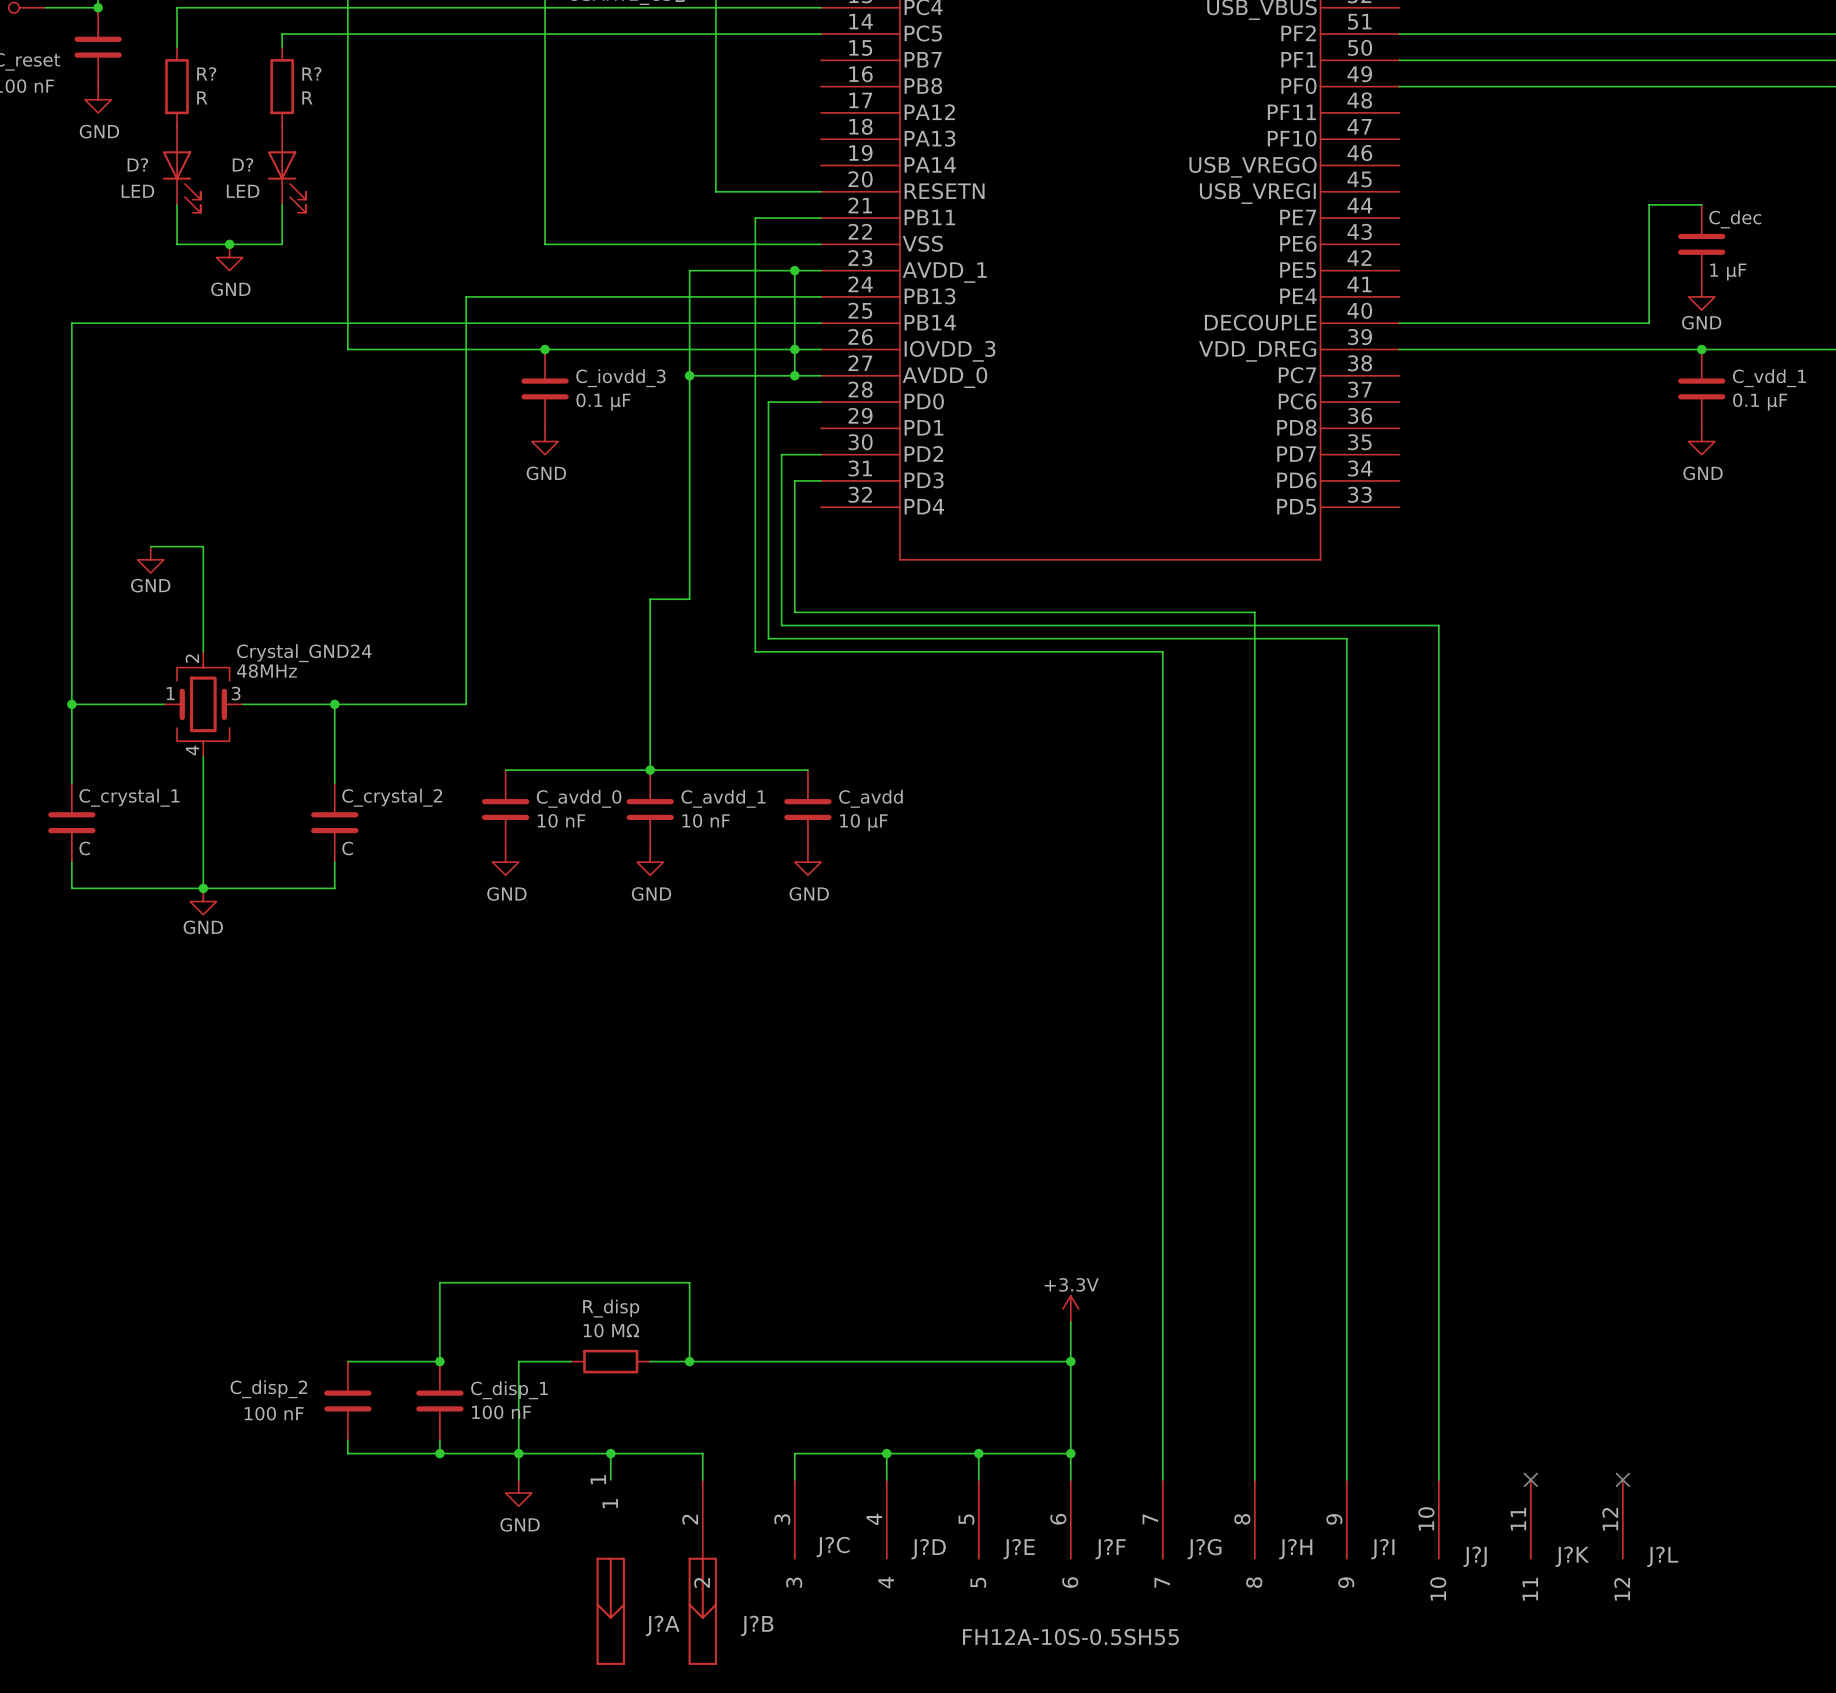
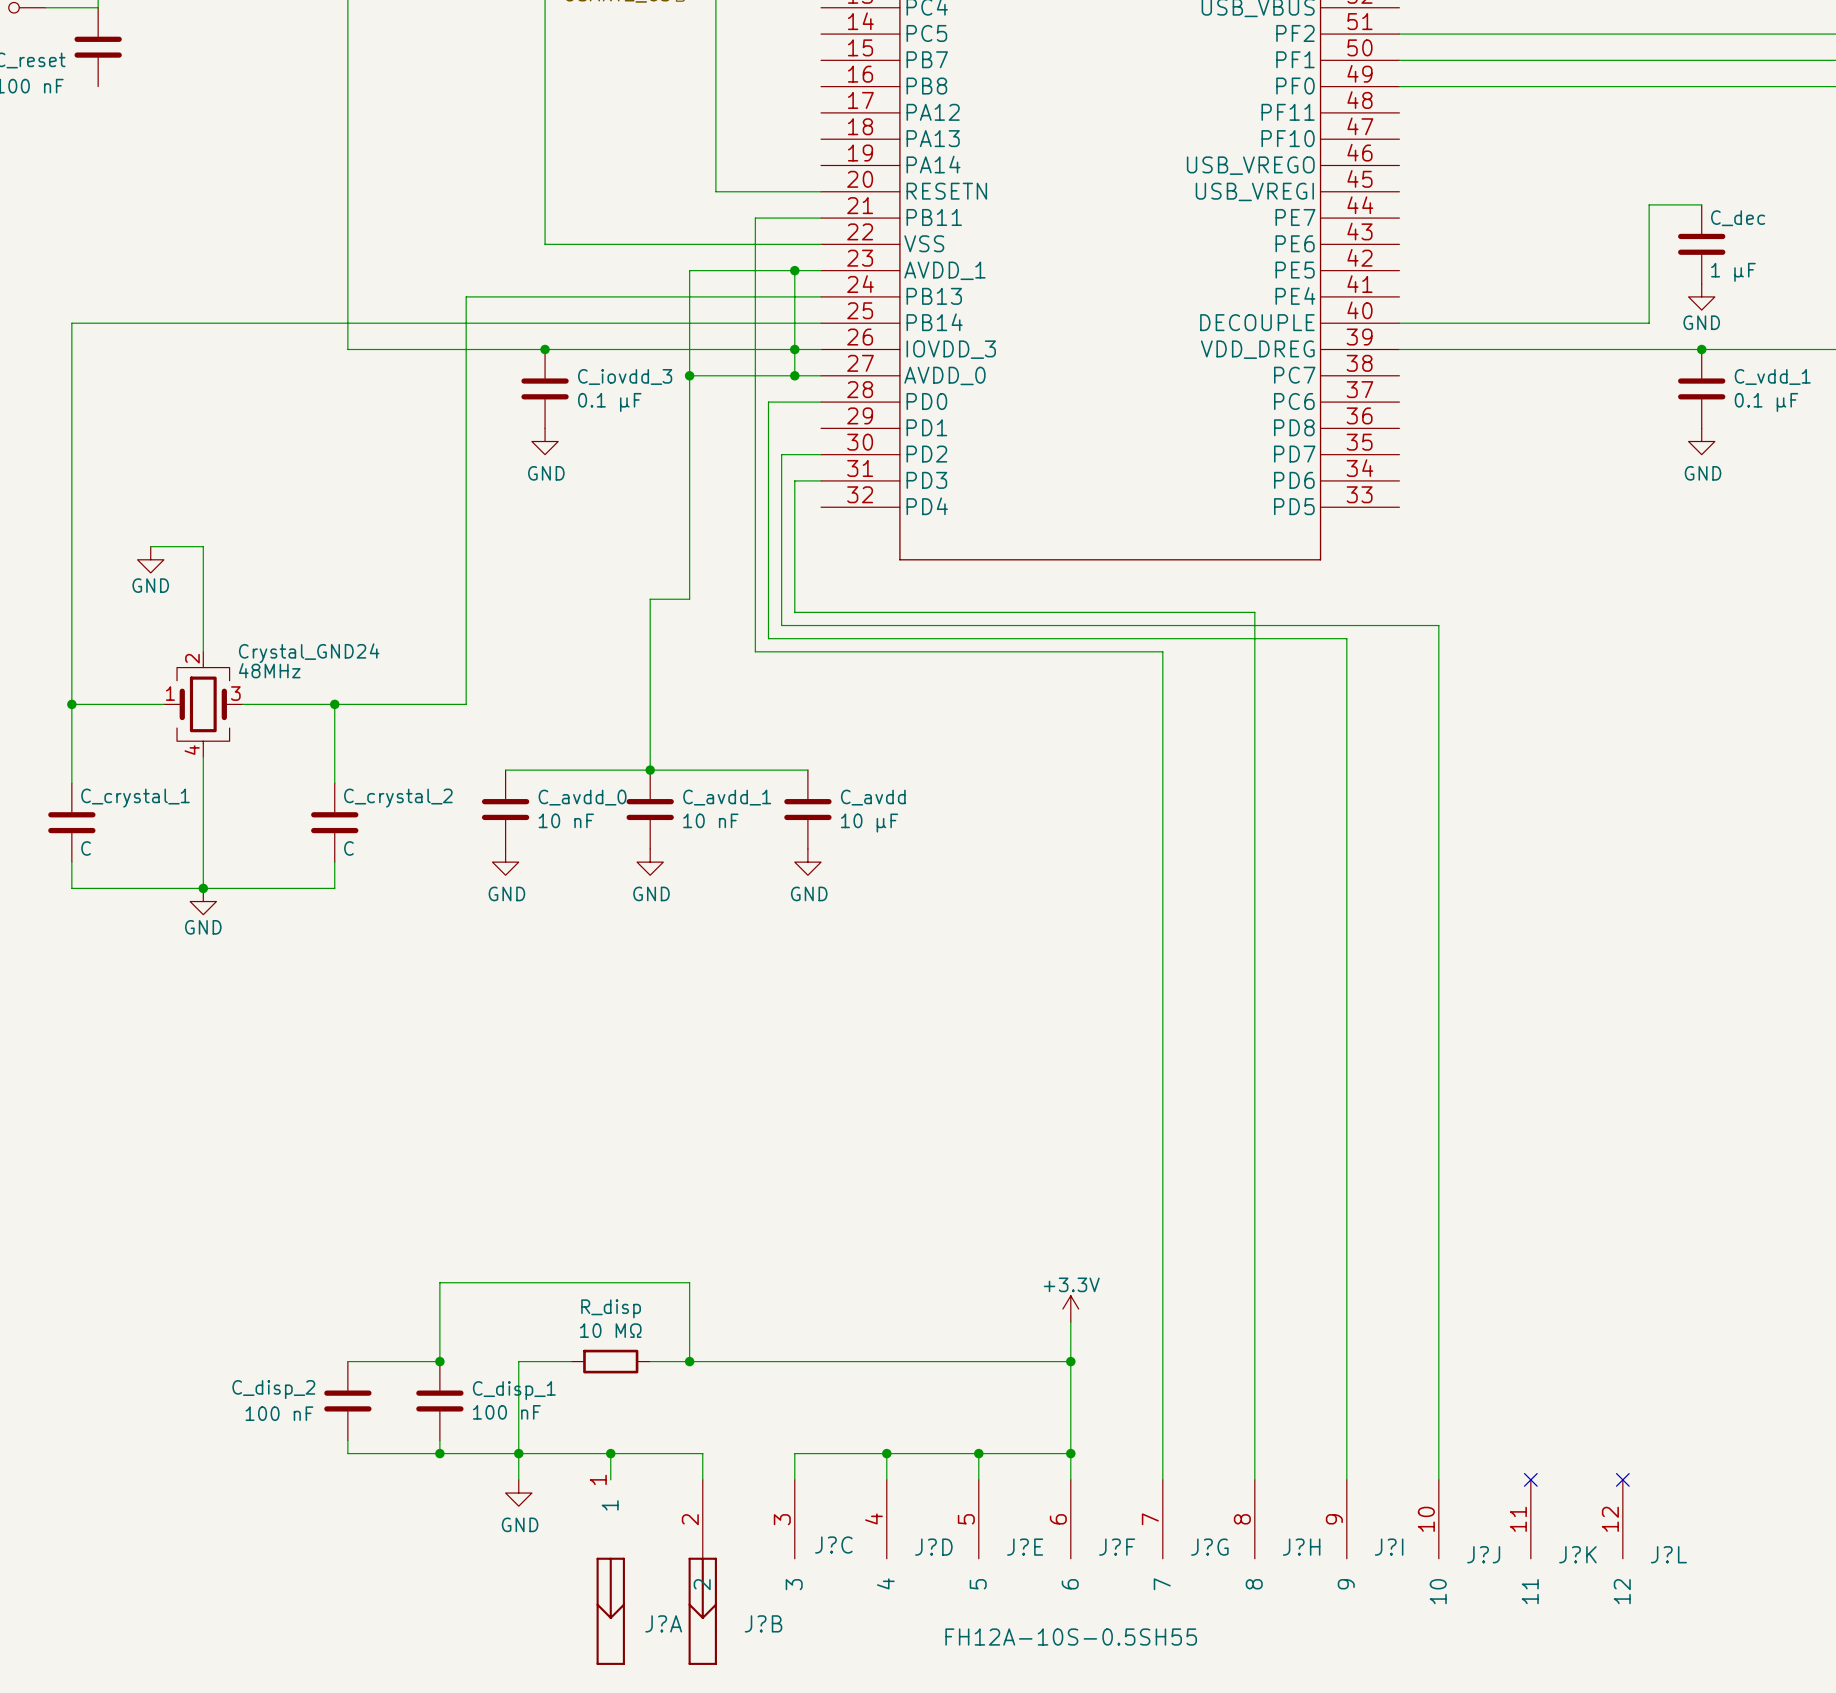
junction: (98, 7) -> none
wire: (821, 7) (177, 7) (177, 47) -> none
wire: (821, 34) (282, 34) (282, 47) -> none
R?: R (177, 86) -> none
R?: R (282, 86) -> none
power symbol: GND (98, 99) -> none
D?: LED (181, 169) -> none
D?: LED (286, 169) -> none
wire: (177, 204) (177, 244) (282, 244) (282, 204) -> none
junction: (229, 244) -> none
power symbol: GND (229, 257) -> none

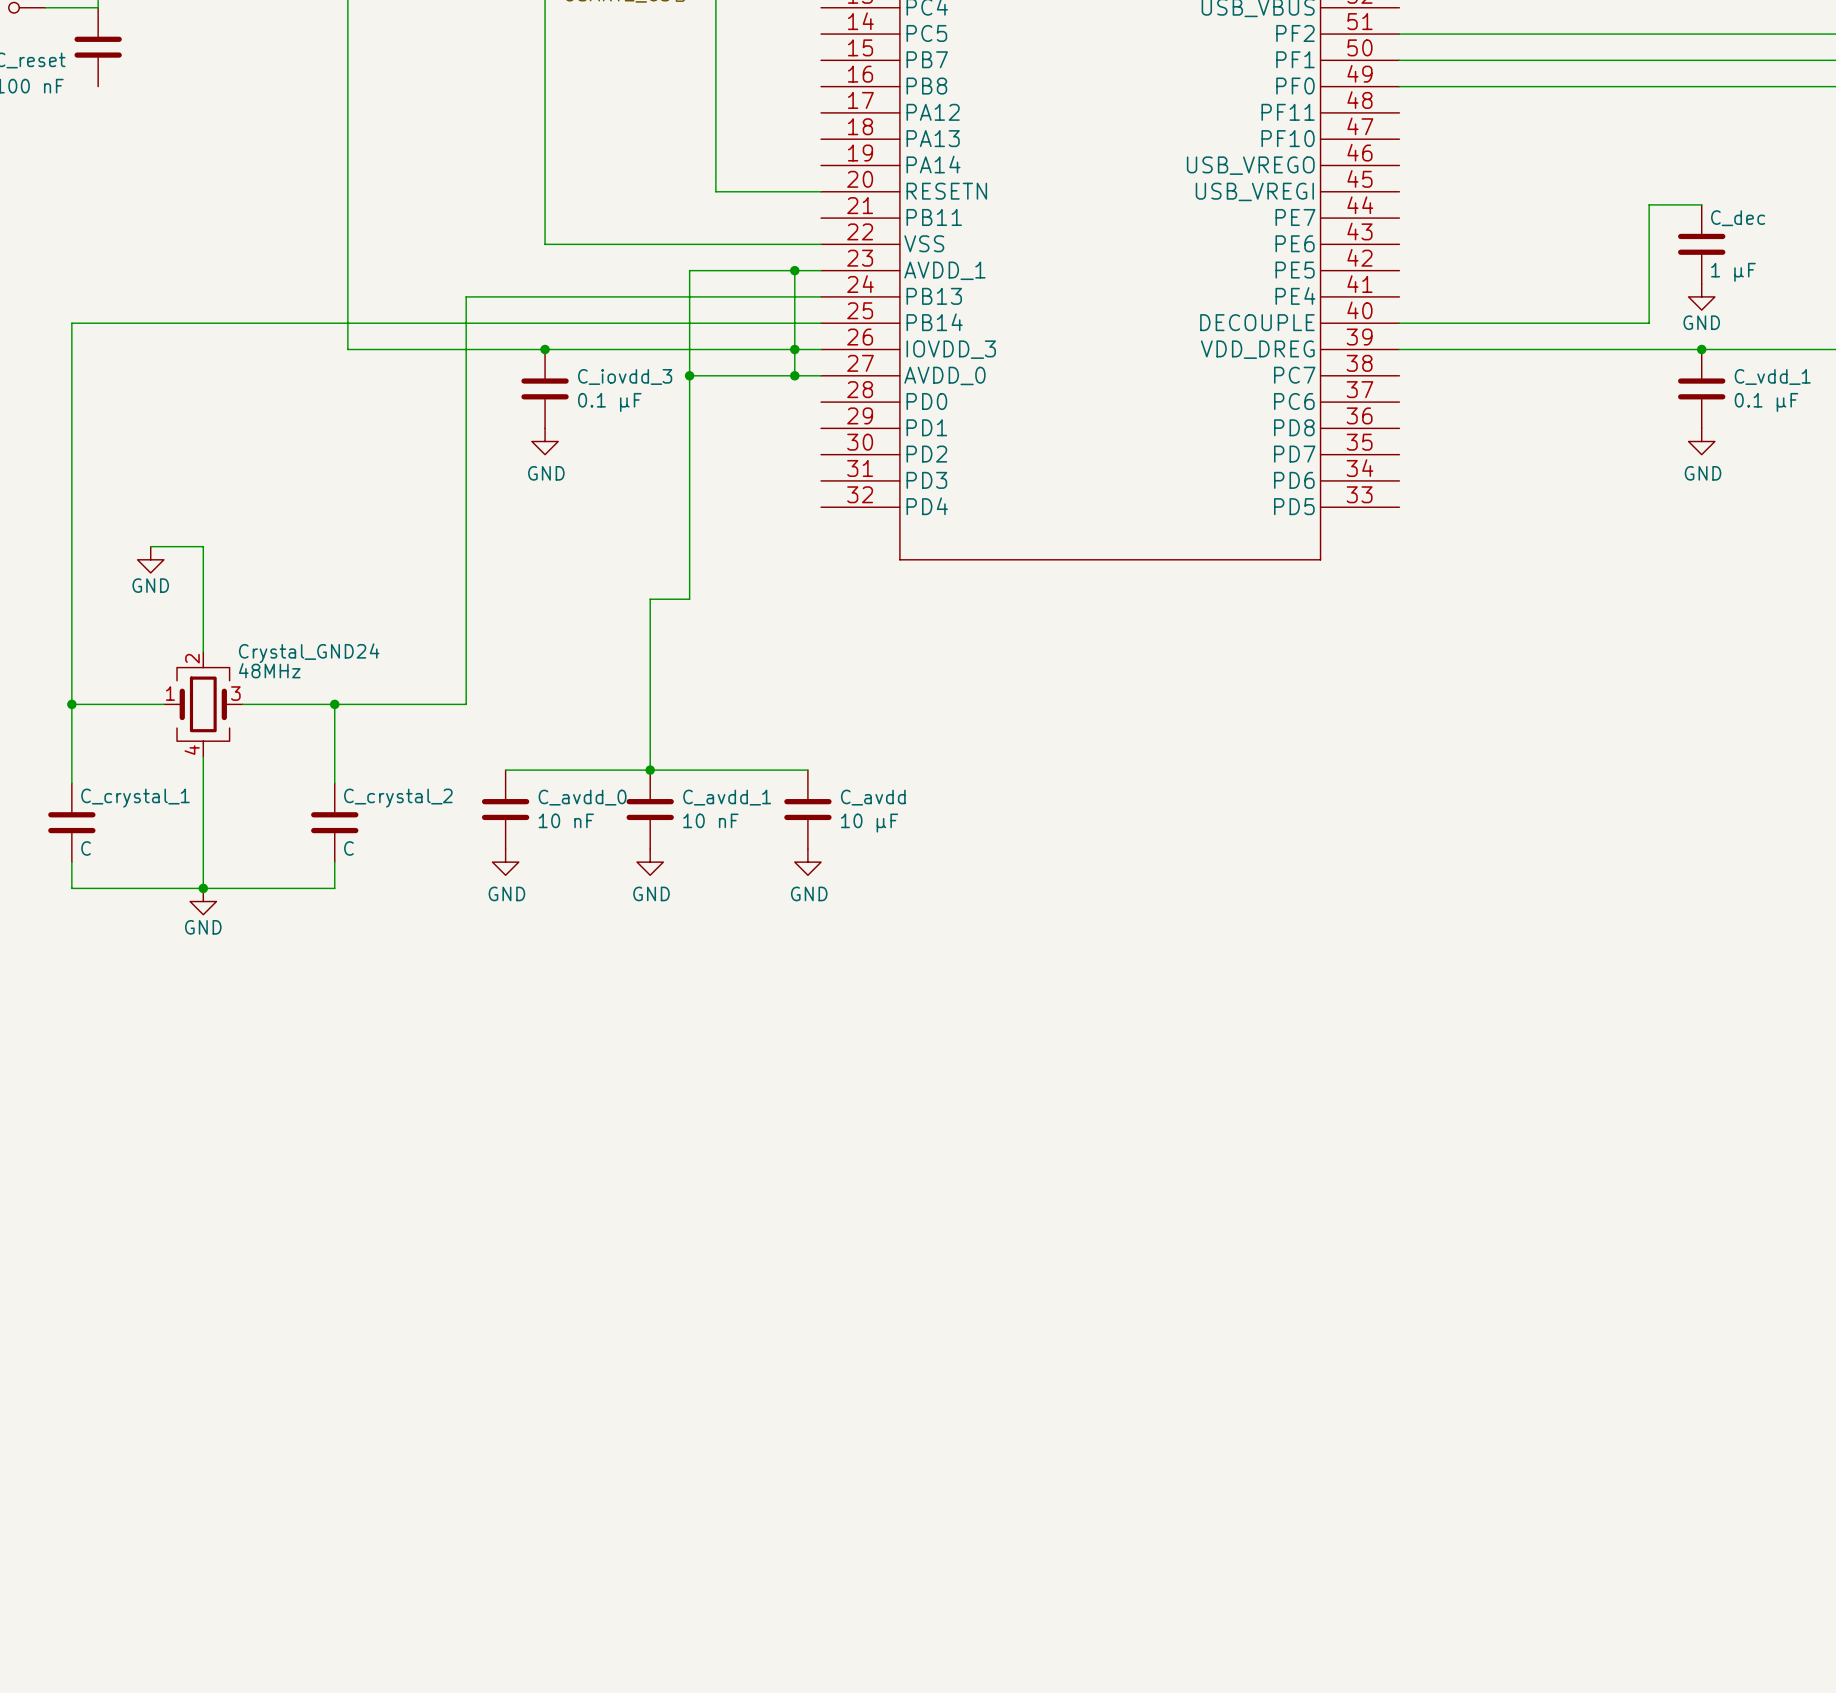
wire: (821, 218) (755, 218) (755, 651) (1162, 651) (1162, 1479) -> none
wire: (821, 402) (768, 402) (768, 638) (1346, 638) (1346, 1479) -> none
wire: (821, 454) (781, 454) (781, 625) (1438, 625) (1438, 1479) -> none
wire: (821, 480) (794, 480) (794, 612) (1254, 612) (1254, 1479) -> none
power symbol: +3.3V (1070, 1309) -> none
wire: (1070, 1322) (1070, 1479) -> none
wire: (347, 1361) (439, 1361) (439, 1282) (689, 1282) (689, 1361) -> none
junction: (439, 1361) -> none
wire: (571, 1361) (518, 1361) (518, 1479) -> none
R_disp: 10 MΩ (610, 1361) -> none
wire: (650, 1361) (1070, 1361) -> none
junction: (689, 1361) -> none
junction: (1070, 1361) -> none
C_disp_2: 100 nF (347, 1401) -> none
C_disp_1: 100 nF (439, 1401) -> none
wire: (347, 1440) (347, 1453) (702, 1453) (702, 1479) -> none
wire: (439, 1440) (439, 1453) -> none
junction: (439, 1453) -> none
junction: (518, 1453) -> none
wire: (610, 1453) (610, 1479) -> none
junction: (610, 1453) -> none
wire: (886, 1453) (886, 1479) -> none
junction: (886, 1453) -> none
wire: (978, 1453) (978, 1479) -> none
junction: (978, 1453) -> none
wire: (1070, 1453) (794, 1453) (794, 1479) -> none
junction: (1070, 1453) -> none
no-connect mark: (1530, 1479) -> none
no-connect mark: (1622, 1479) -> none
power symbol: GND (518, 1493) -> none
J?C: (794, 1519) -> none
J?D: (886, 1519) -> none
J?E: (978, 1519) -> none
J?F: (1070, 1519) -> none
J?G: (1162, 1519) -> none
J?H: (1254, 1519) -> none
J?I: (1346, 1519) -> none
J?J: (1438, 1519) -> none
J?K: (1530, 1519) -> none
J?L: (1622, 1519) -> none
J?B: (702, 1572) -> none
J?A: FH12A-10S-0.5SH55 (610, 1611) -> none

